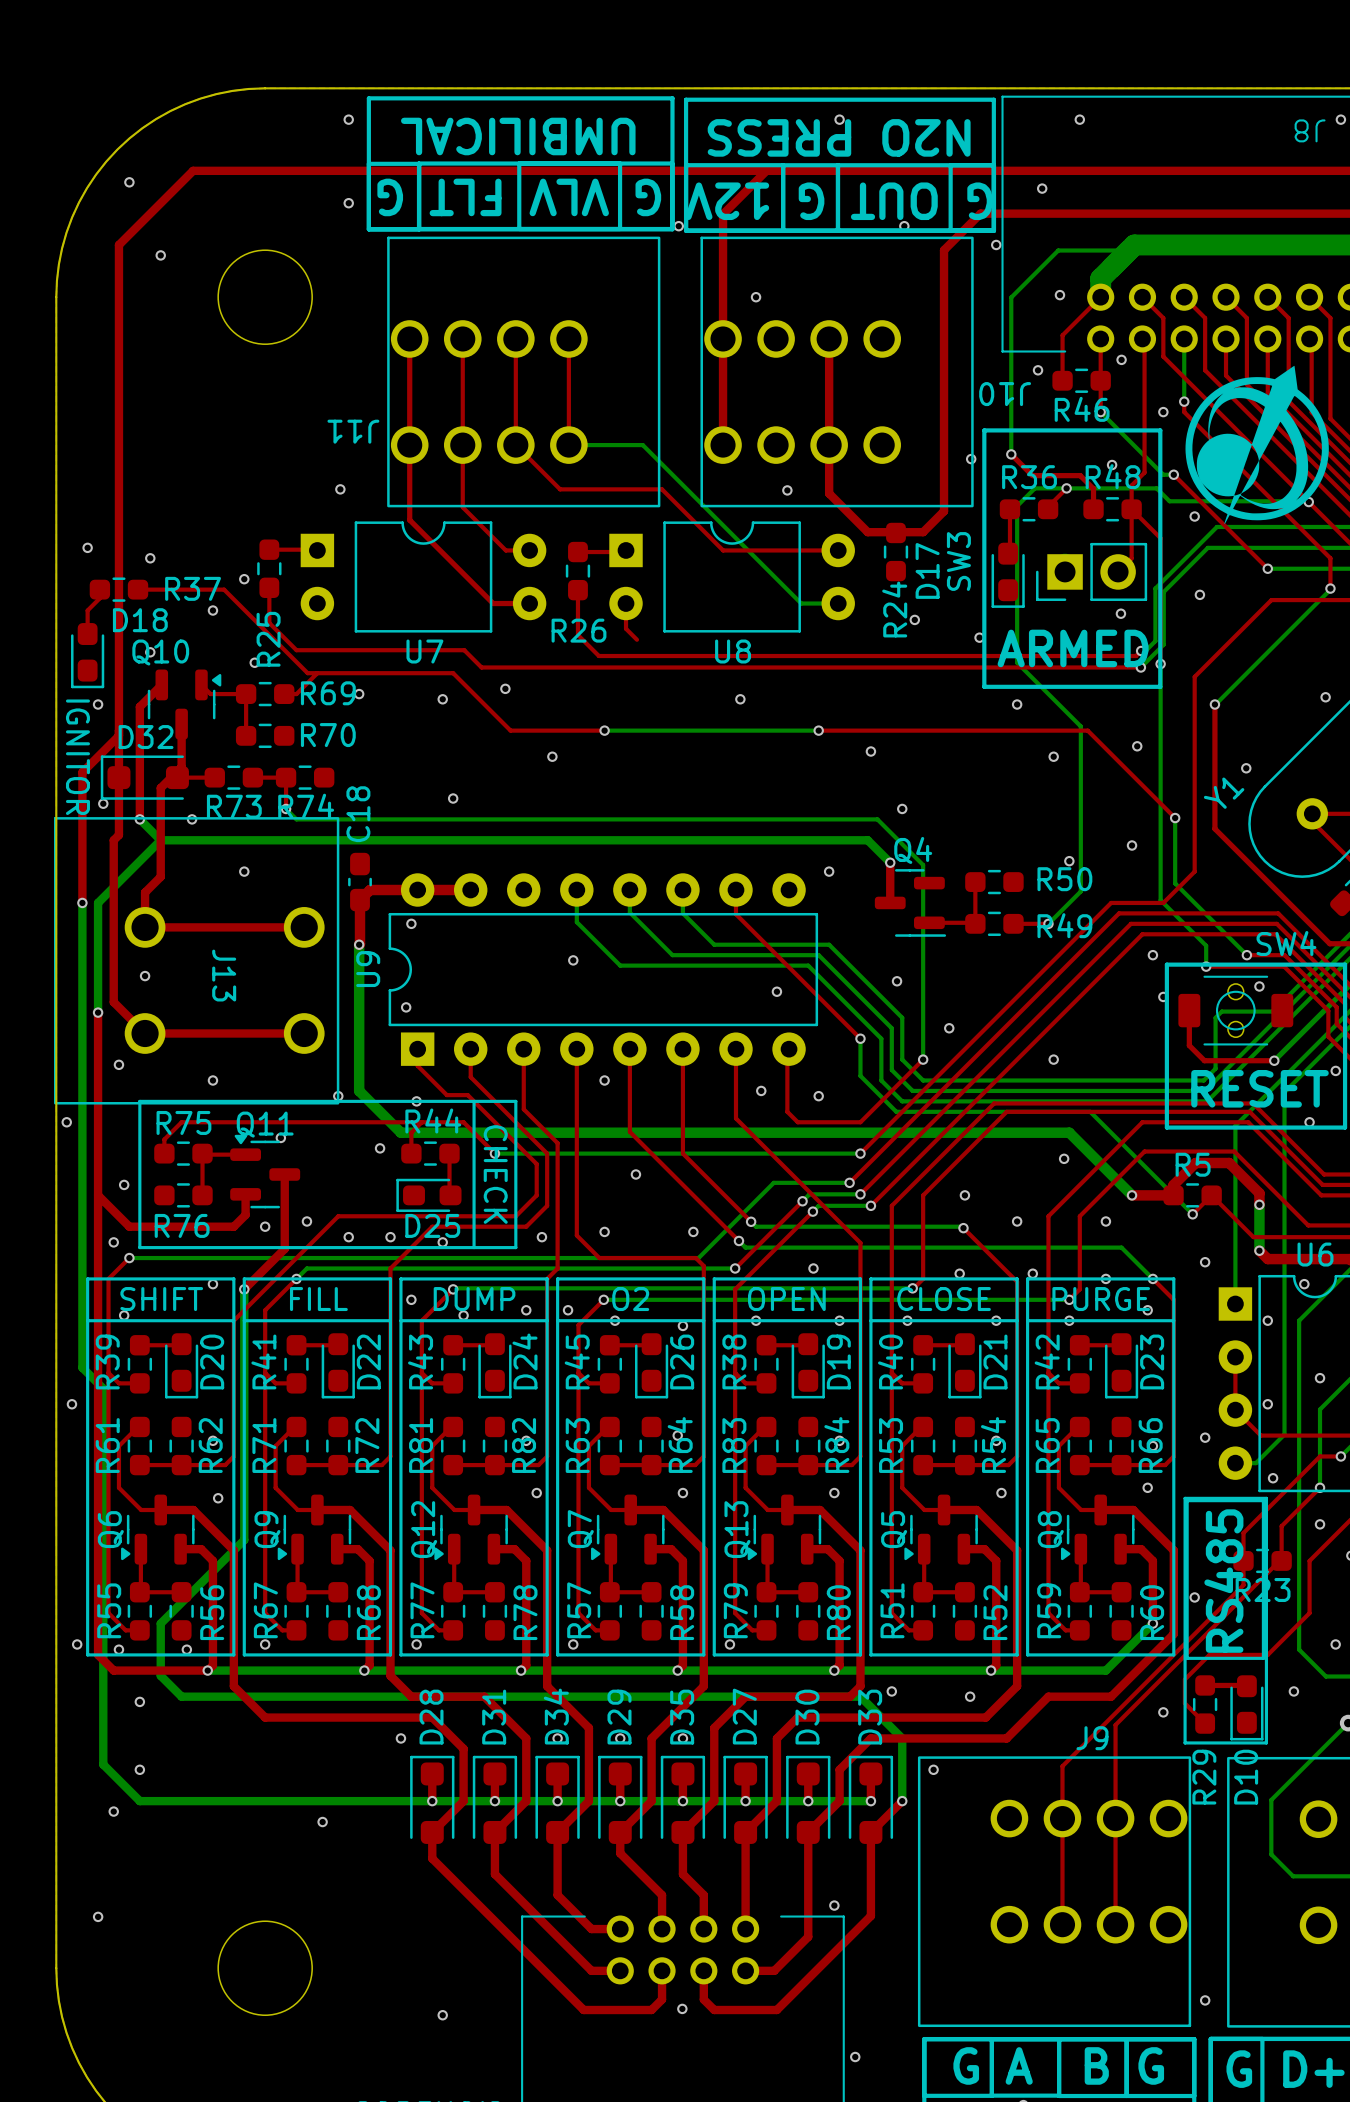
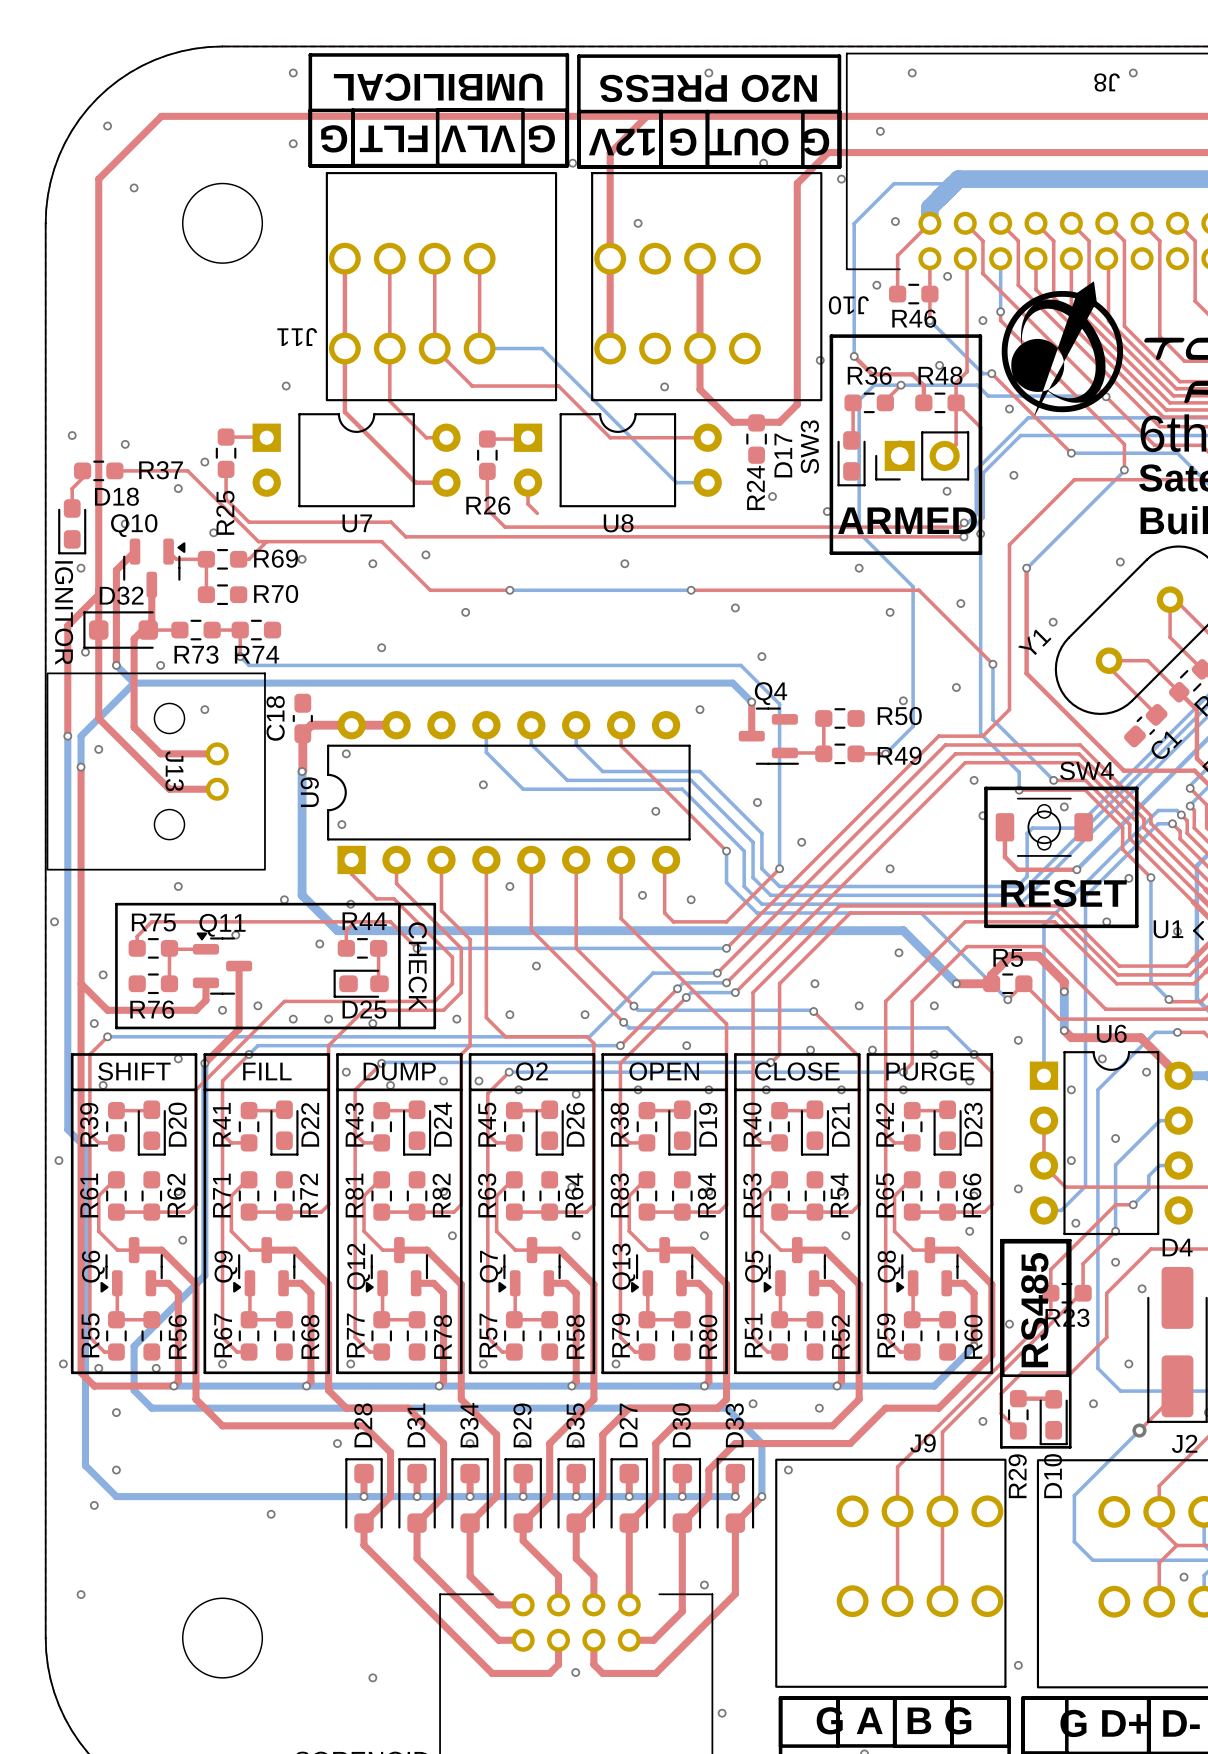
C18 name position: C18 (358, 814) -> C18 (275, 718)
J13 footprint: [54, 817, 340, 1105] -> [46, 672, 266, 871]
top track: (118, 835) (113, 840) (113, 1002) (145, 1033) (304, 1033) -> (98, 678) (98, 718) (169, 789) (217, 789)
top track: (160, 876) (145, 892) (145, 927) (304, 927) -> (134, 714) (134, 727) (160, 753) (217, 753)
via: none -> (98, 749)
top track: none -> (81, 767) (81, 829)
bottom track: (98, 939) (98, 1012) -> none
via: none -> (81, 767)
via: (145, 976) -> none
via: (98, 1012) -> none
via: (118, 1064) -> none

